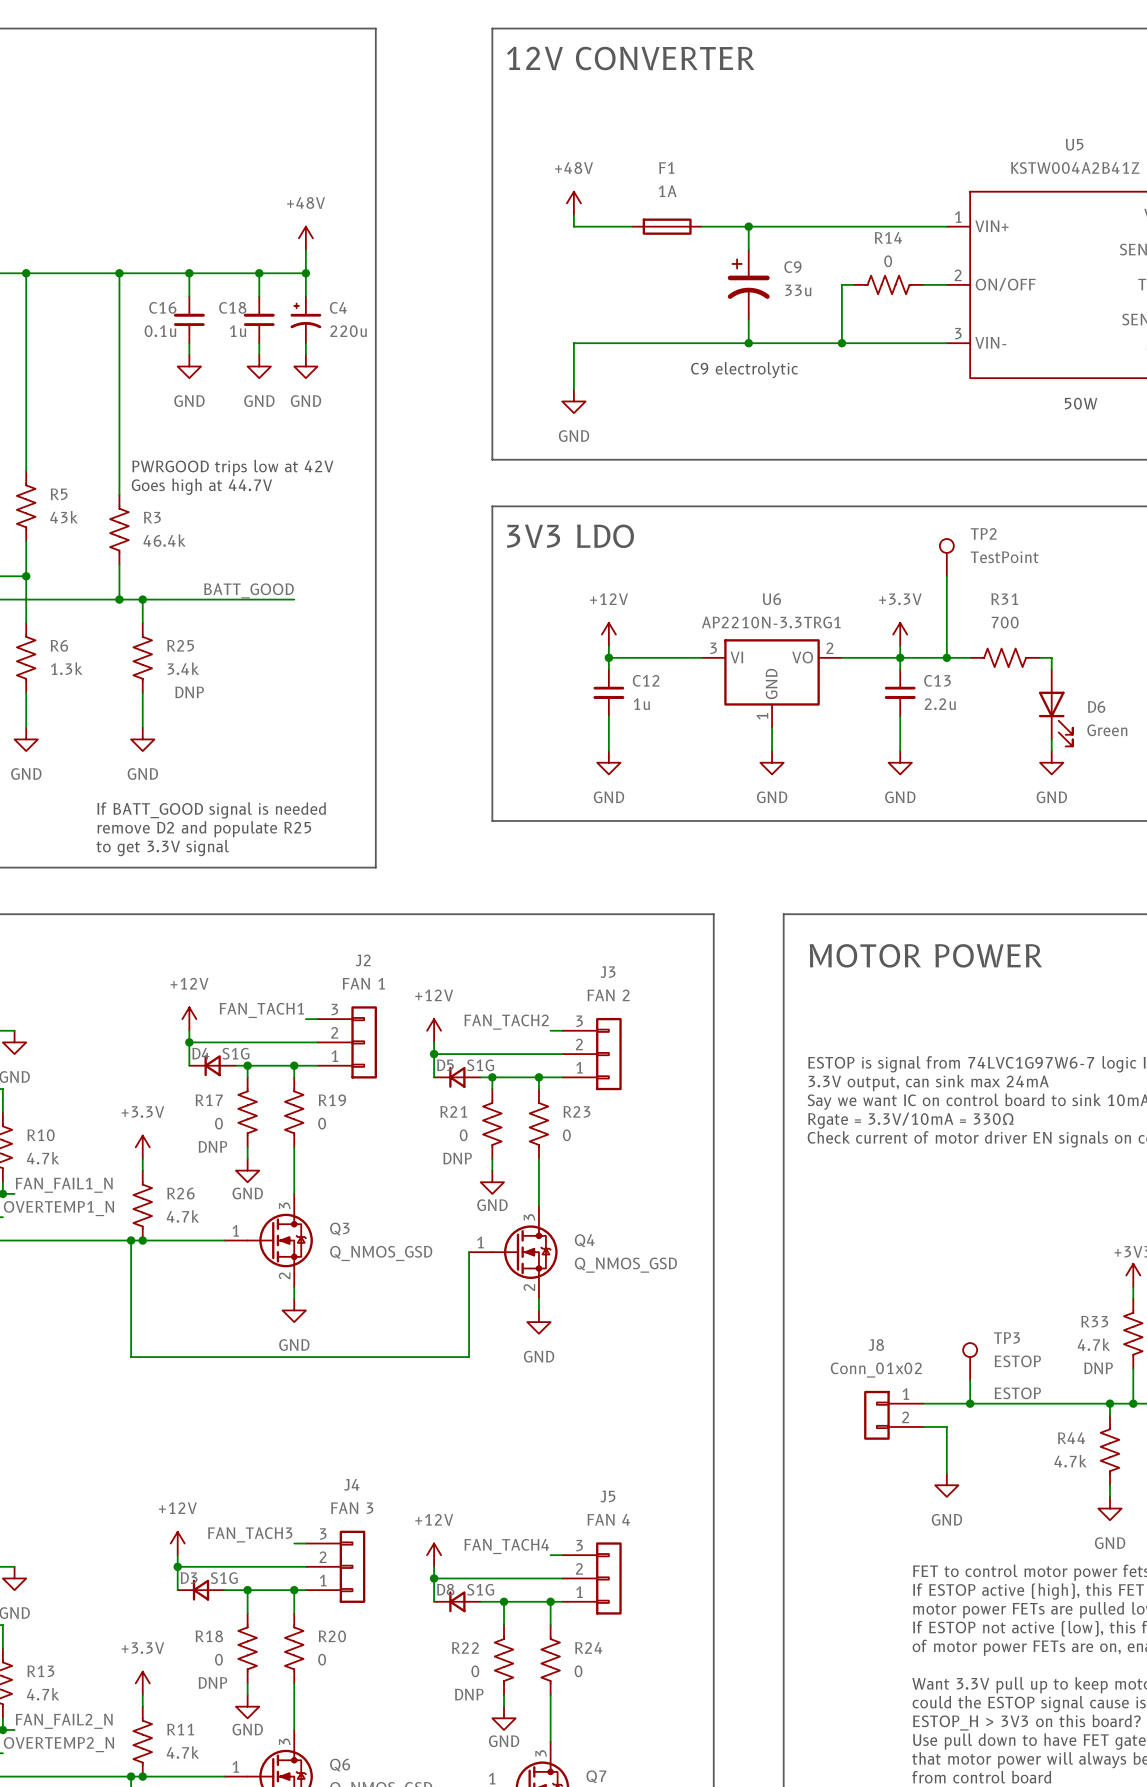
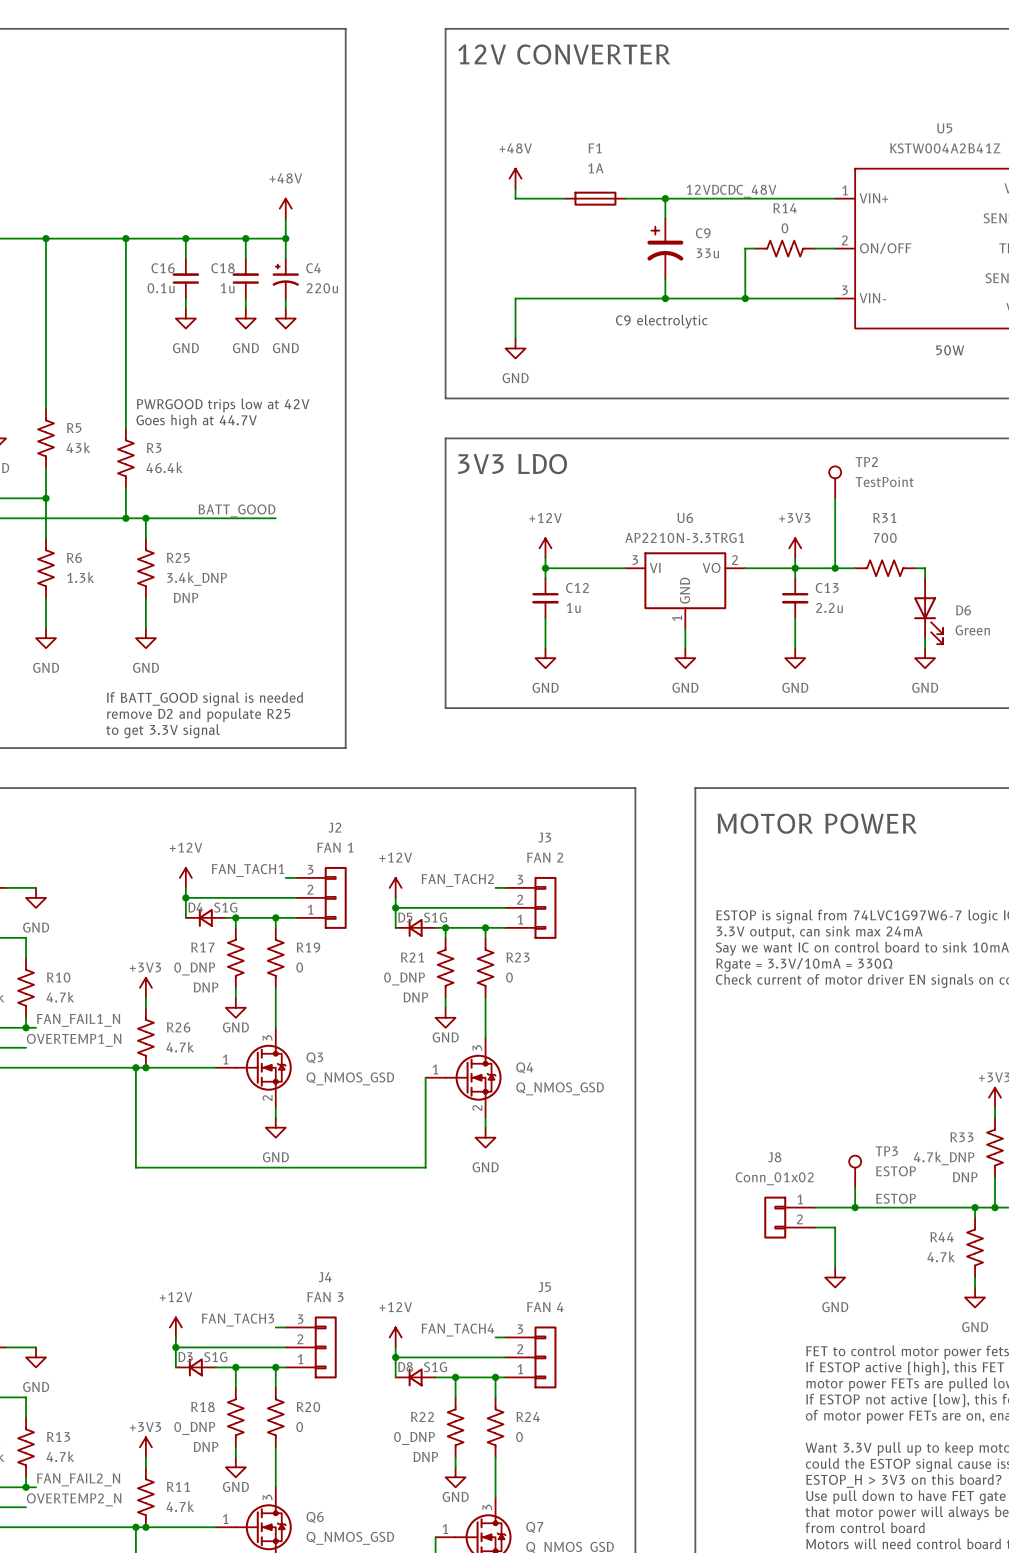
label: none -> 12VDCDC_48V (731, 191)
power symbol: +3.3V (900, 634) -> +3V3 (795, 548)
R25 value: 3.4k (183, 668) -> 3.4k_DNP (197, 579)
R17 value: 0 (218, 1123) -> 0_DNP (194, 968)
R21 value: 0 (463, 1135) -> 0_DNP (404, 978)
power symbol: +3.3V (142, 1147) -> +3V3 (145, 987)
R33 value: 4.7k (1093, 1344) -> 4.7k_DNP (944, 1158)
R18 value: 0 (218, 1659) -> 0_DNP (194, 1428)
R22 value: 0 (475, 1671) -> 0_DNP (414, 1438)
power symbol: +3.3V (142, 1683) -> +3V3 (145, 1447)

